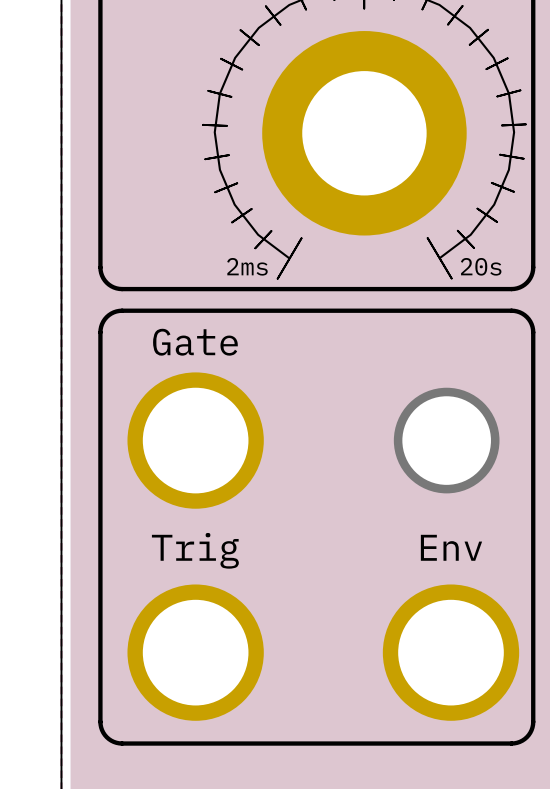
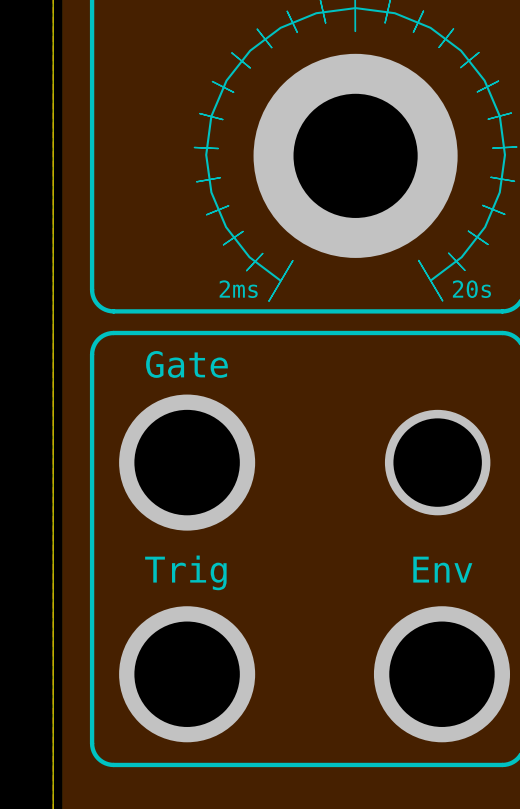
part: (364, 133) -> none
via: none -> (355, 155)
part: (195, 440) -> none
via: none -> (187, 462)
part: (195, 652) -> none
via: none -> (187, 674)
part: (451, 652) -> none
via: none -> (441, 674)

